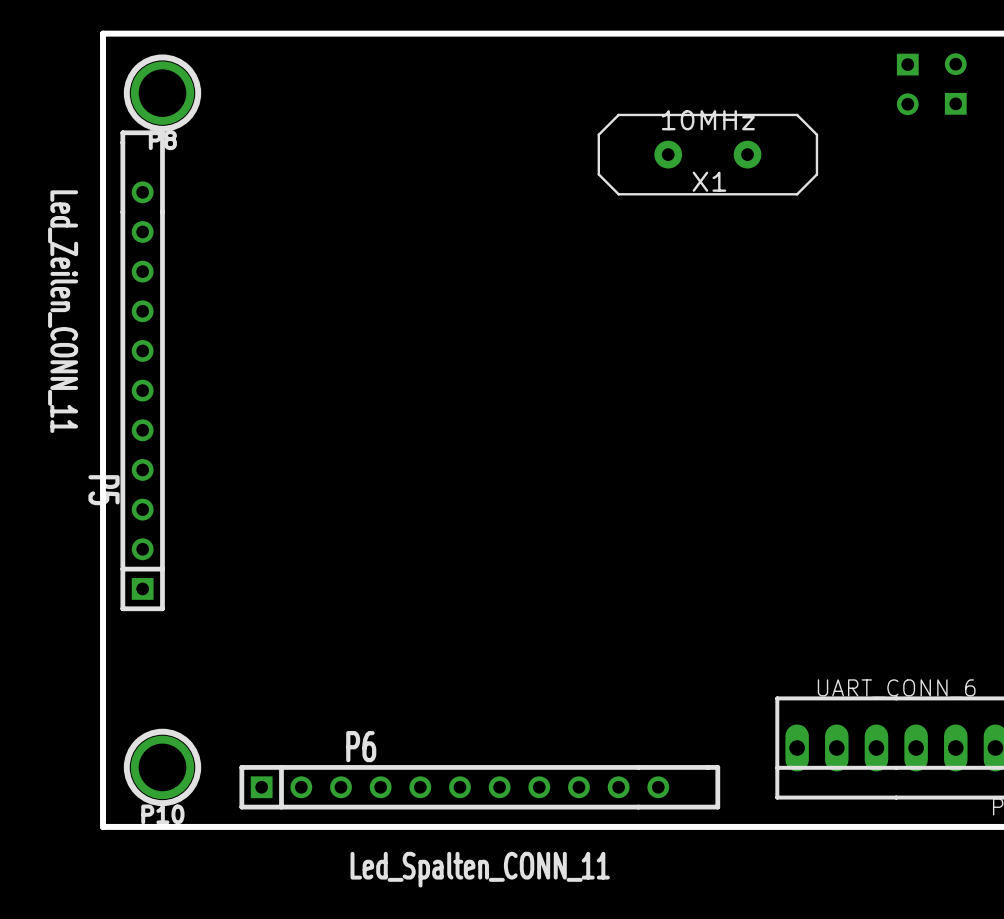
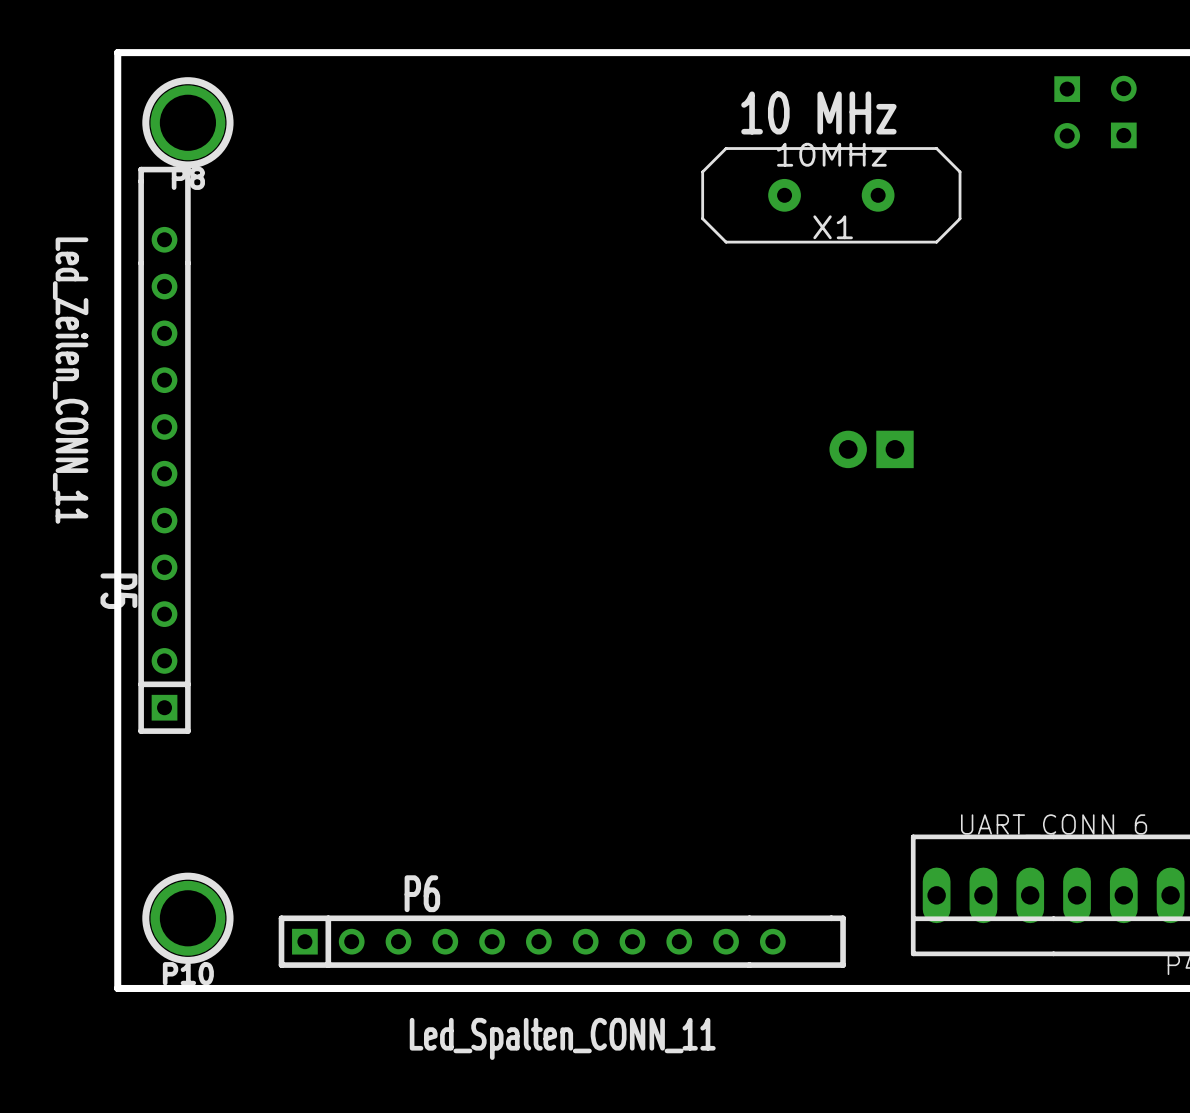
text: none -> 10 MHz (818, 112)
part: none -> (871, 449)

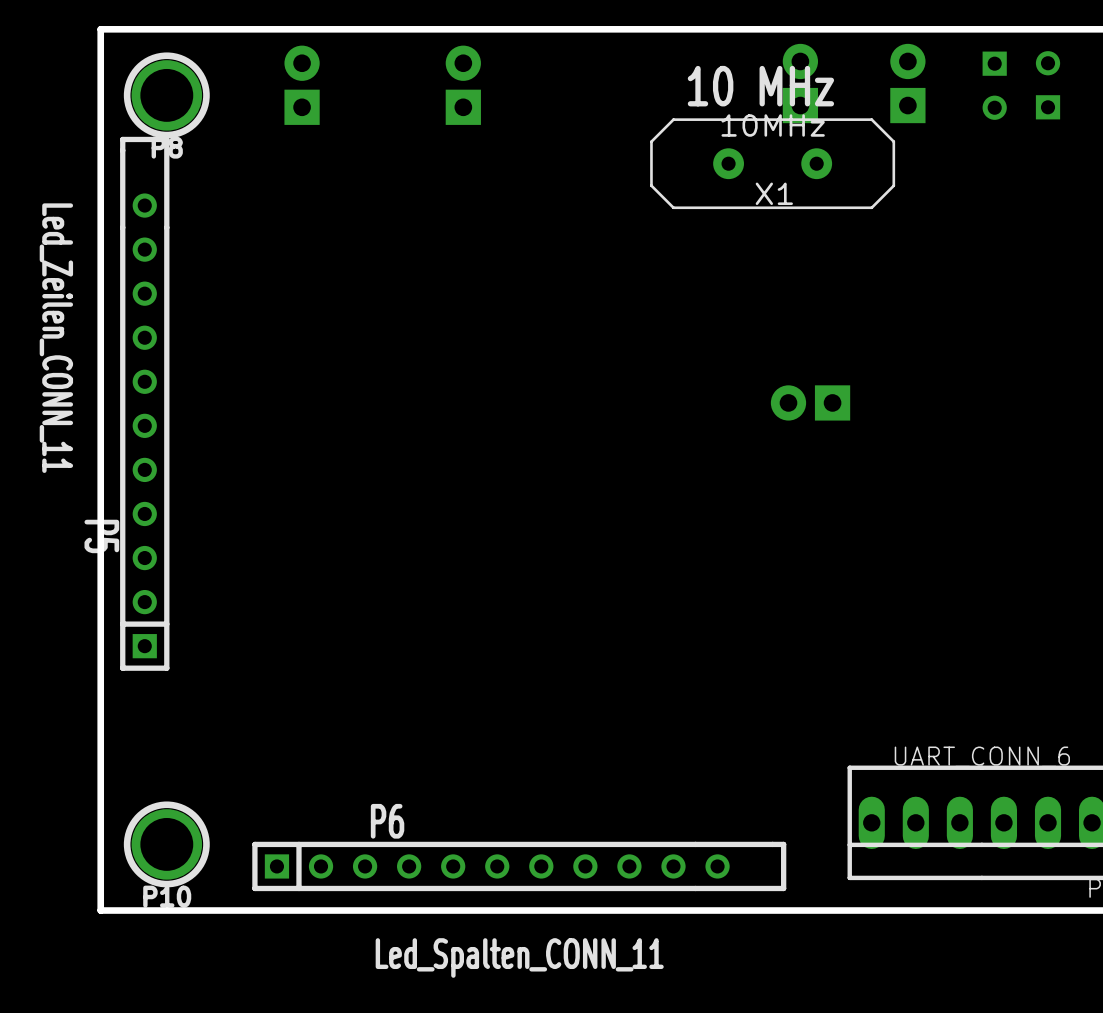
part: none -> (800, 83)
part: none -> (907, 83)
part: none -> (302, 85)
part: none -> (463, 85)

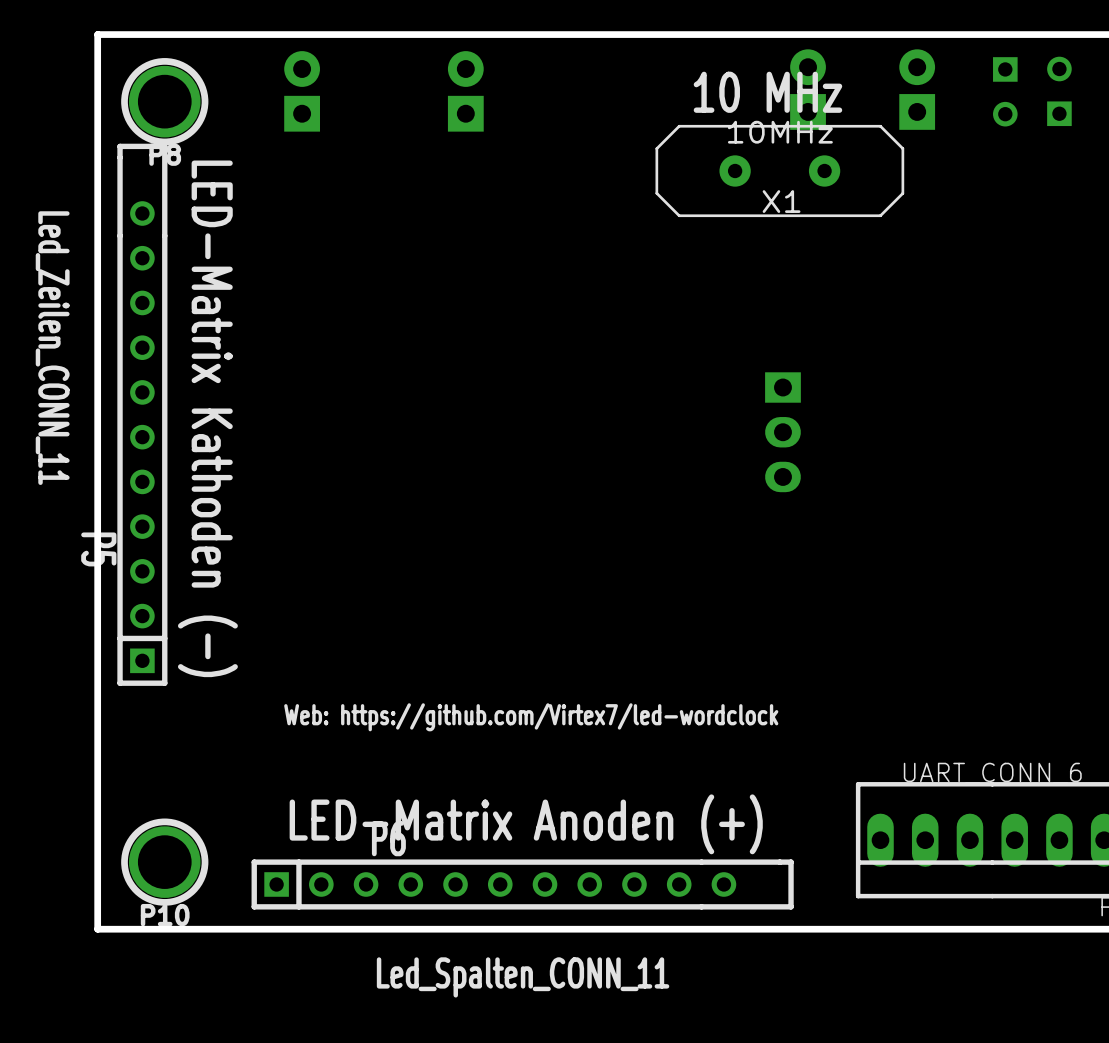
part: (810, 402) -> none
text: none -> LED-Matrix Kathoden (-) (207, 418)
part: none -> (782, 432)
text: none -> Web: https://github.com/Virtex7/led-wordclock (531, 717)
text: none -> LED-Matrix Anoden (+) (526, 824)

